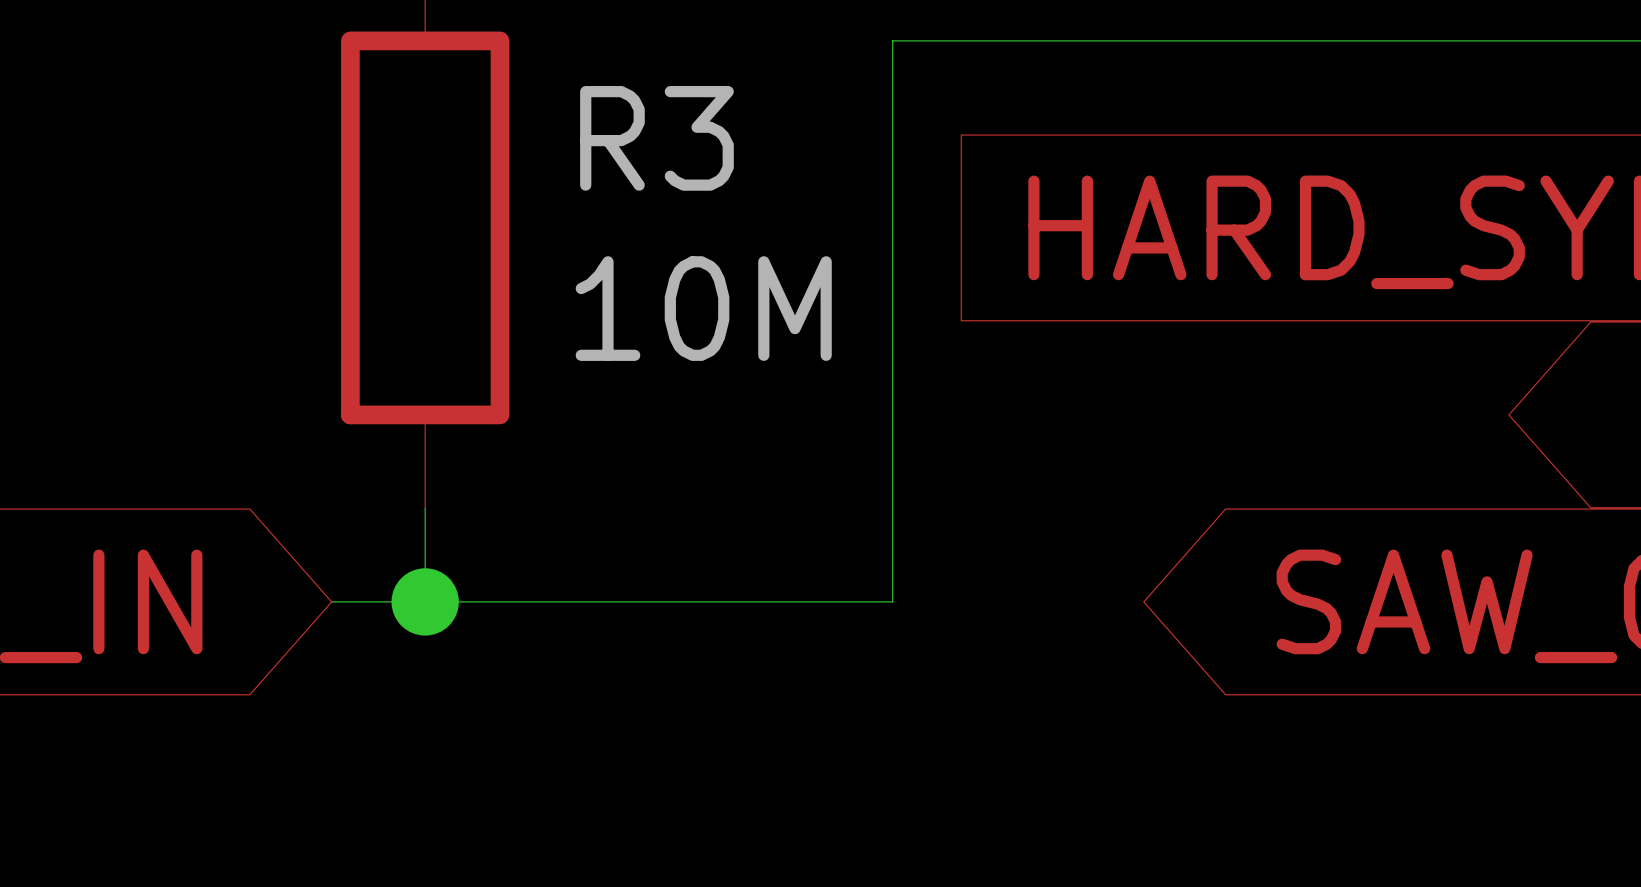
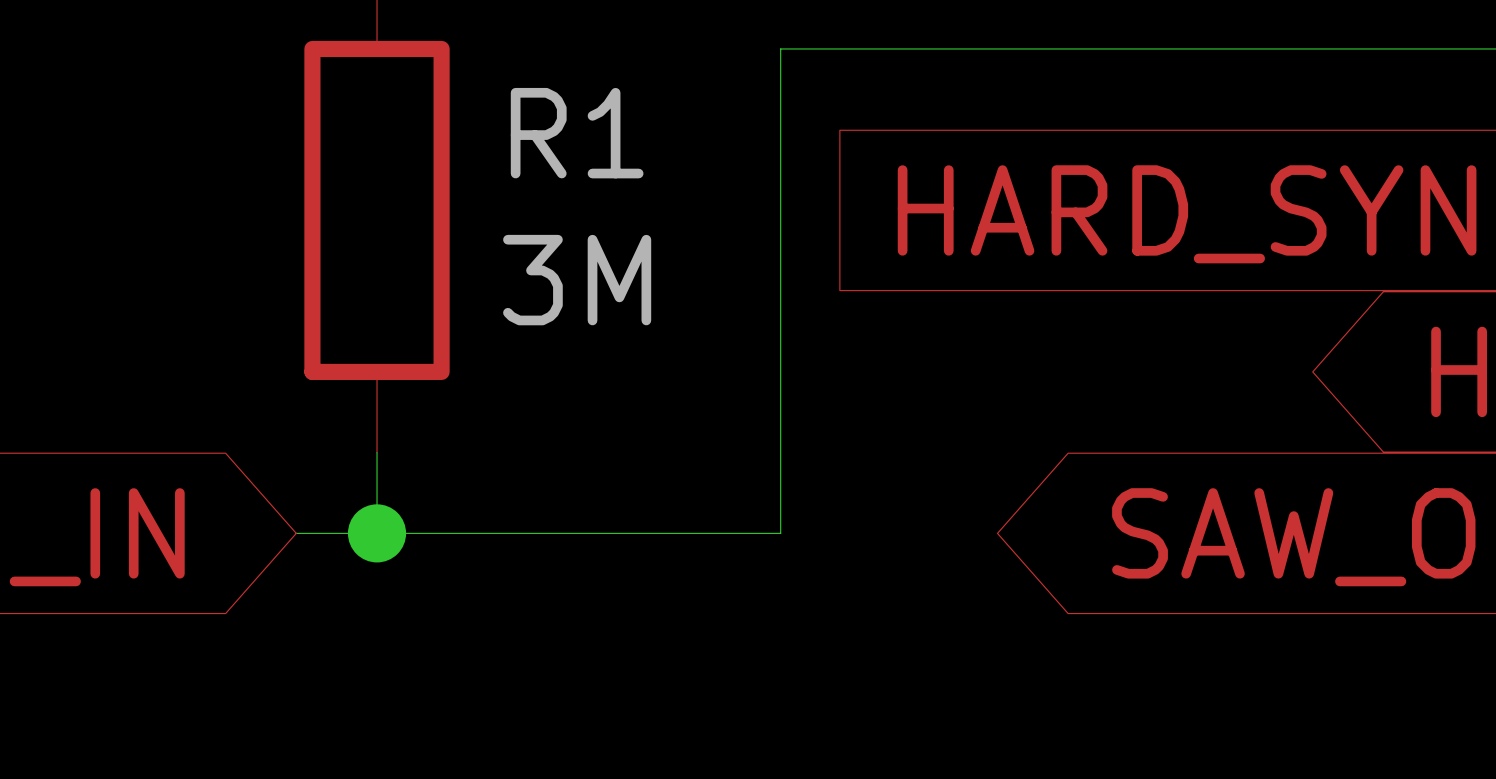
R3 name: R3 (656, 138) -> R1 (577, 133)
R3 value: 10M (703, 308) -> 3M (577, 280)

